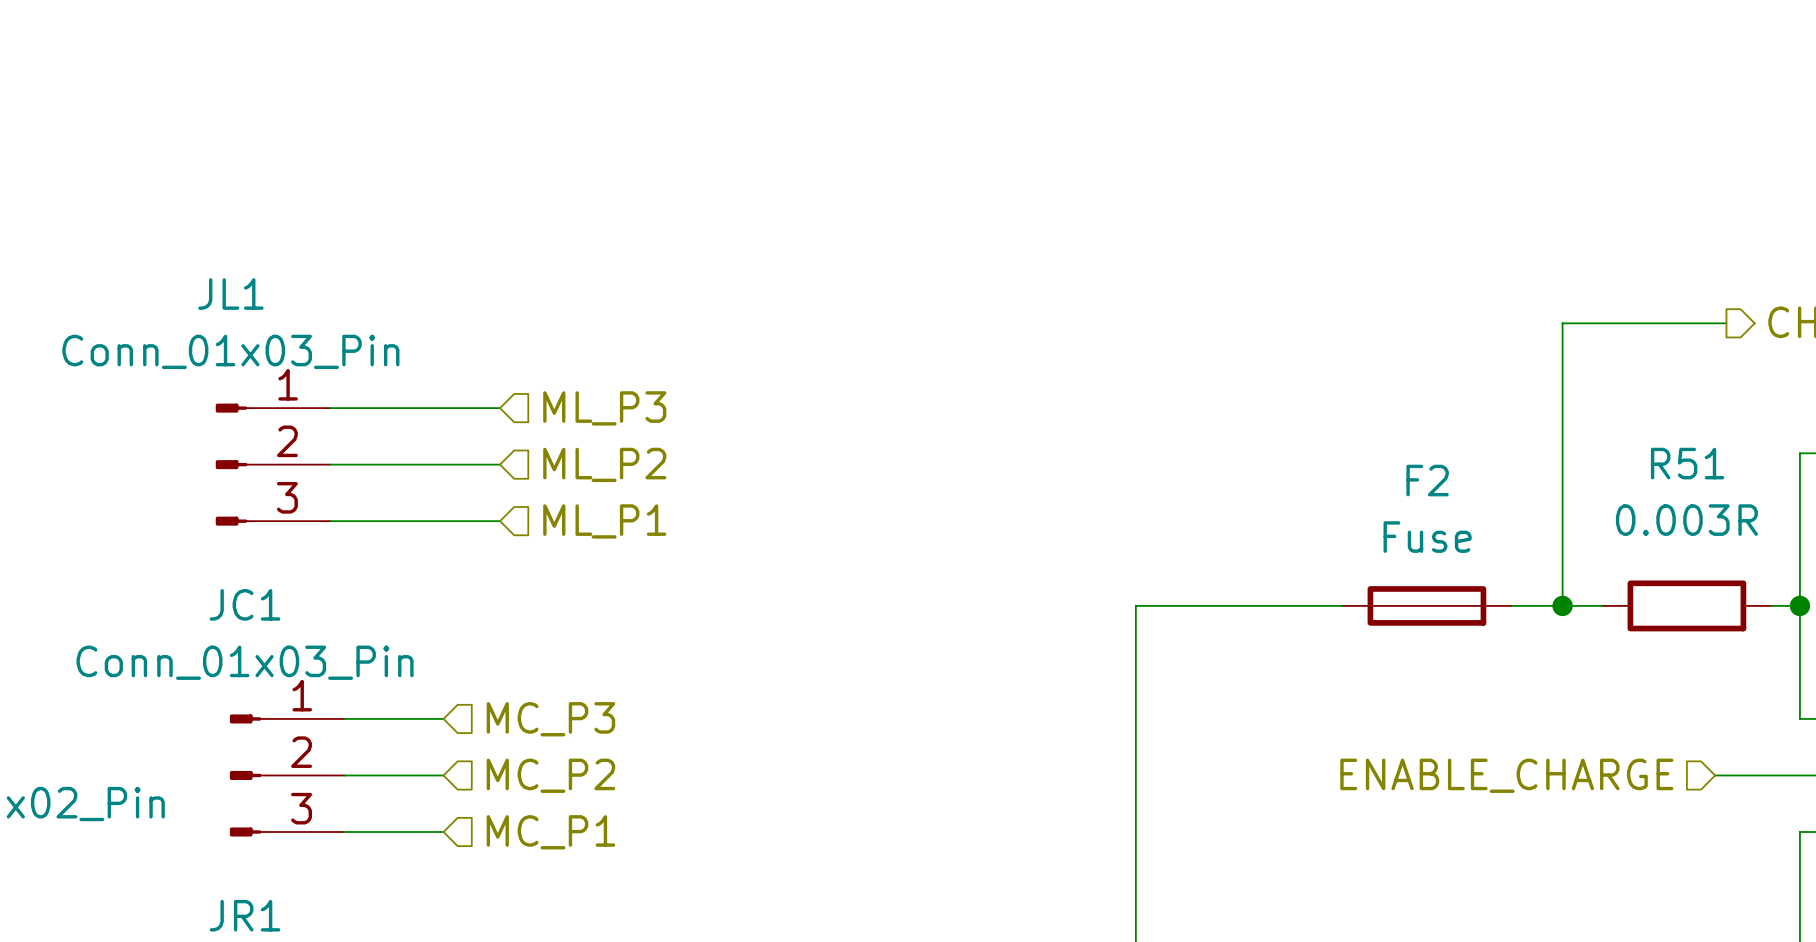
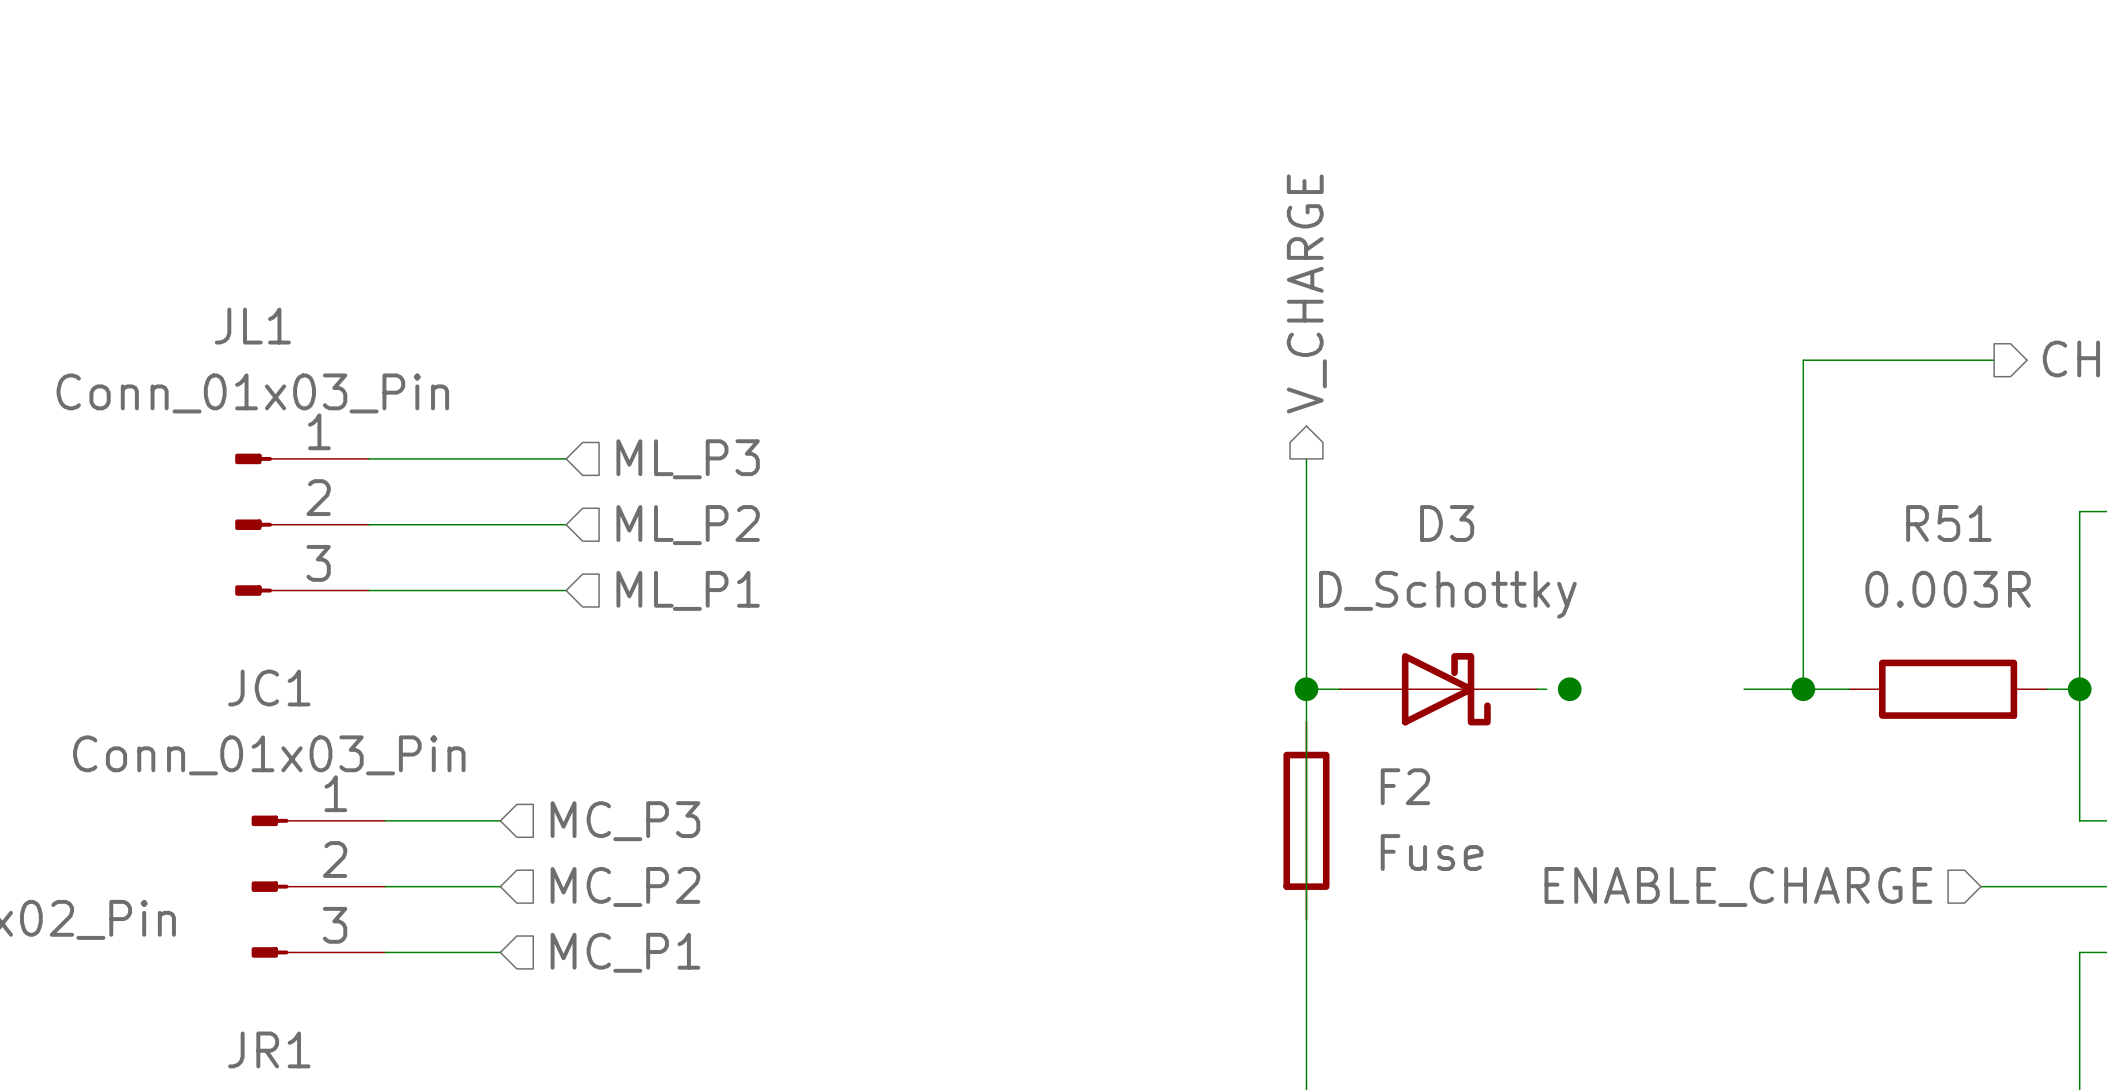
hierarchical label: none -> V_CHARGE (1306, 293)
wire: none -> (1306, 458) (1306, 689)
F2 name position: F2 (1427, 480) -> F2 (1405, 786)
F2 value position: Fuse (1427, 537) -> Fuse (1432, 852)
junction: none -> (1306, 689)
D3: none -> D_Schottky (1438, 689)
junction: none -> (1569, 689)
F2 rotation: 0° (1426, 605) -> 90° clockwise (1306, 820)
F2 position: (1426, 605) -> (1306, 820)

